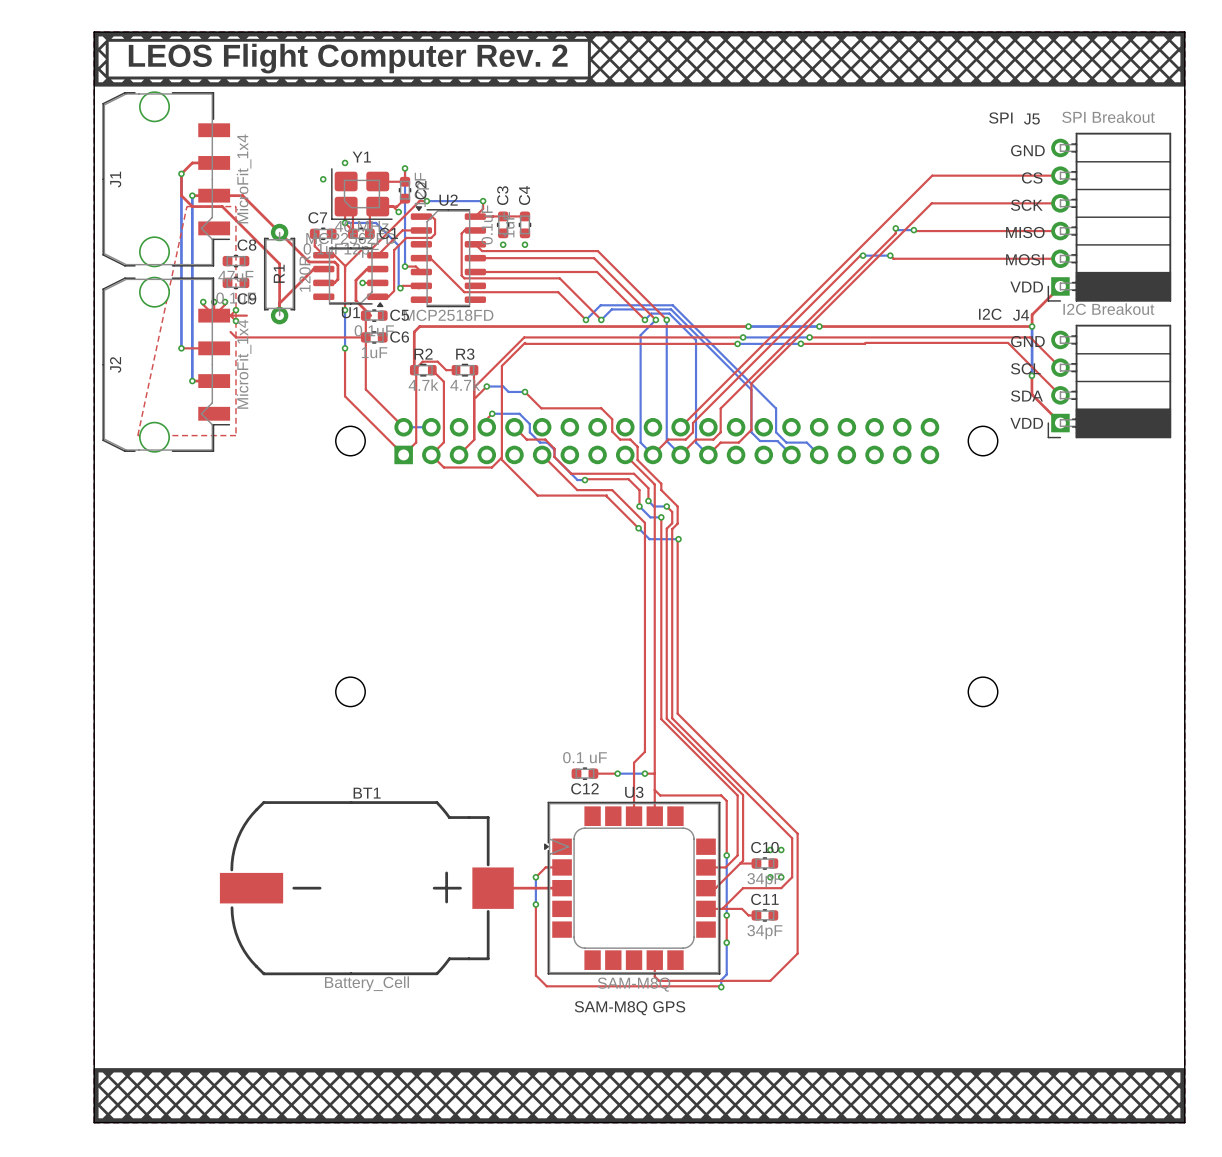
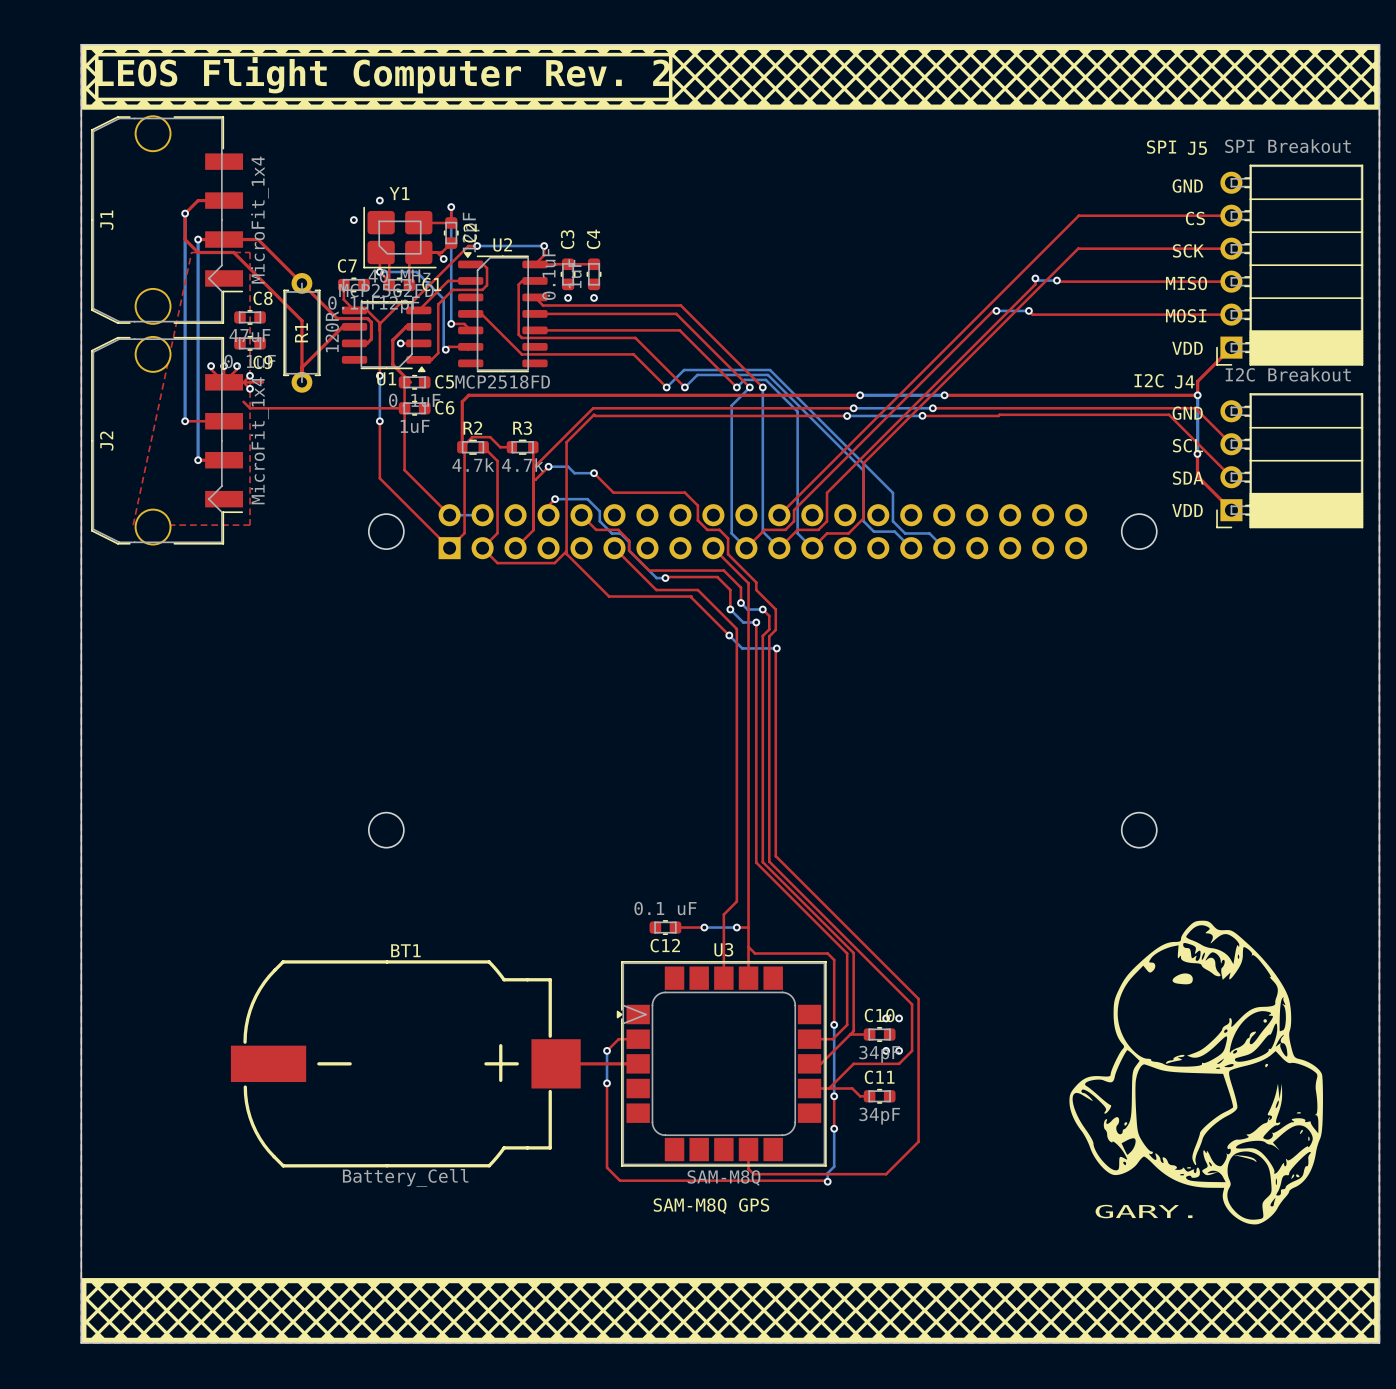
drawing: none -> [1069, 920, 1323, 1225]
text: none -> GARY. (1144, 1211)

